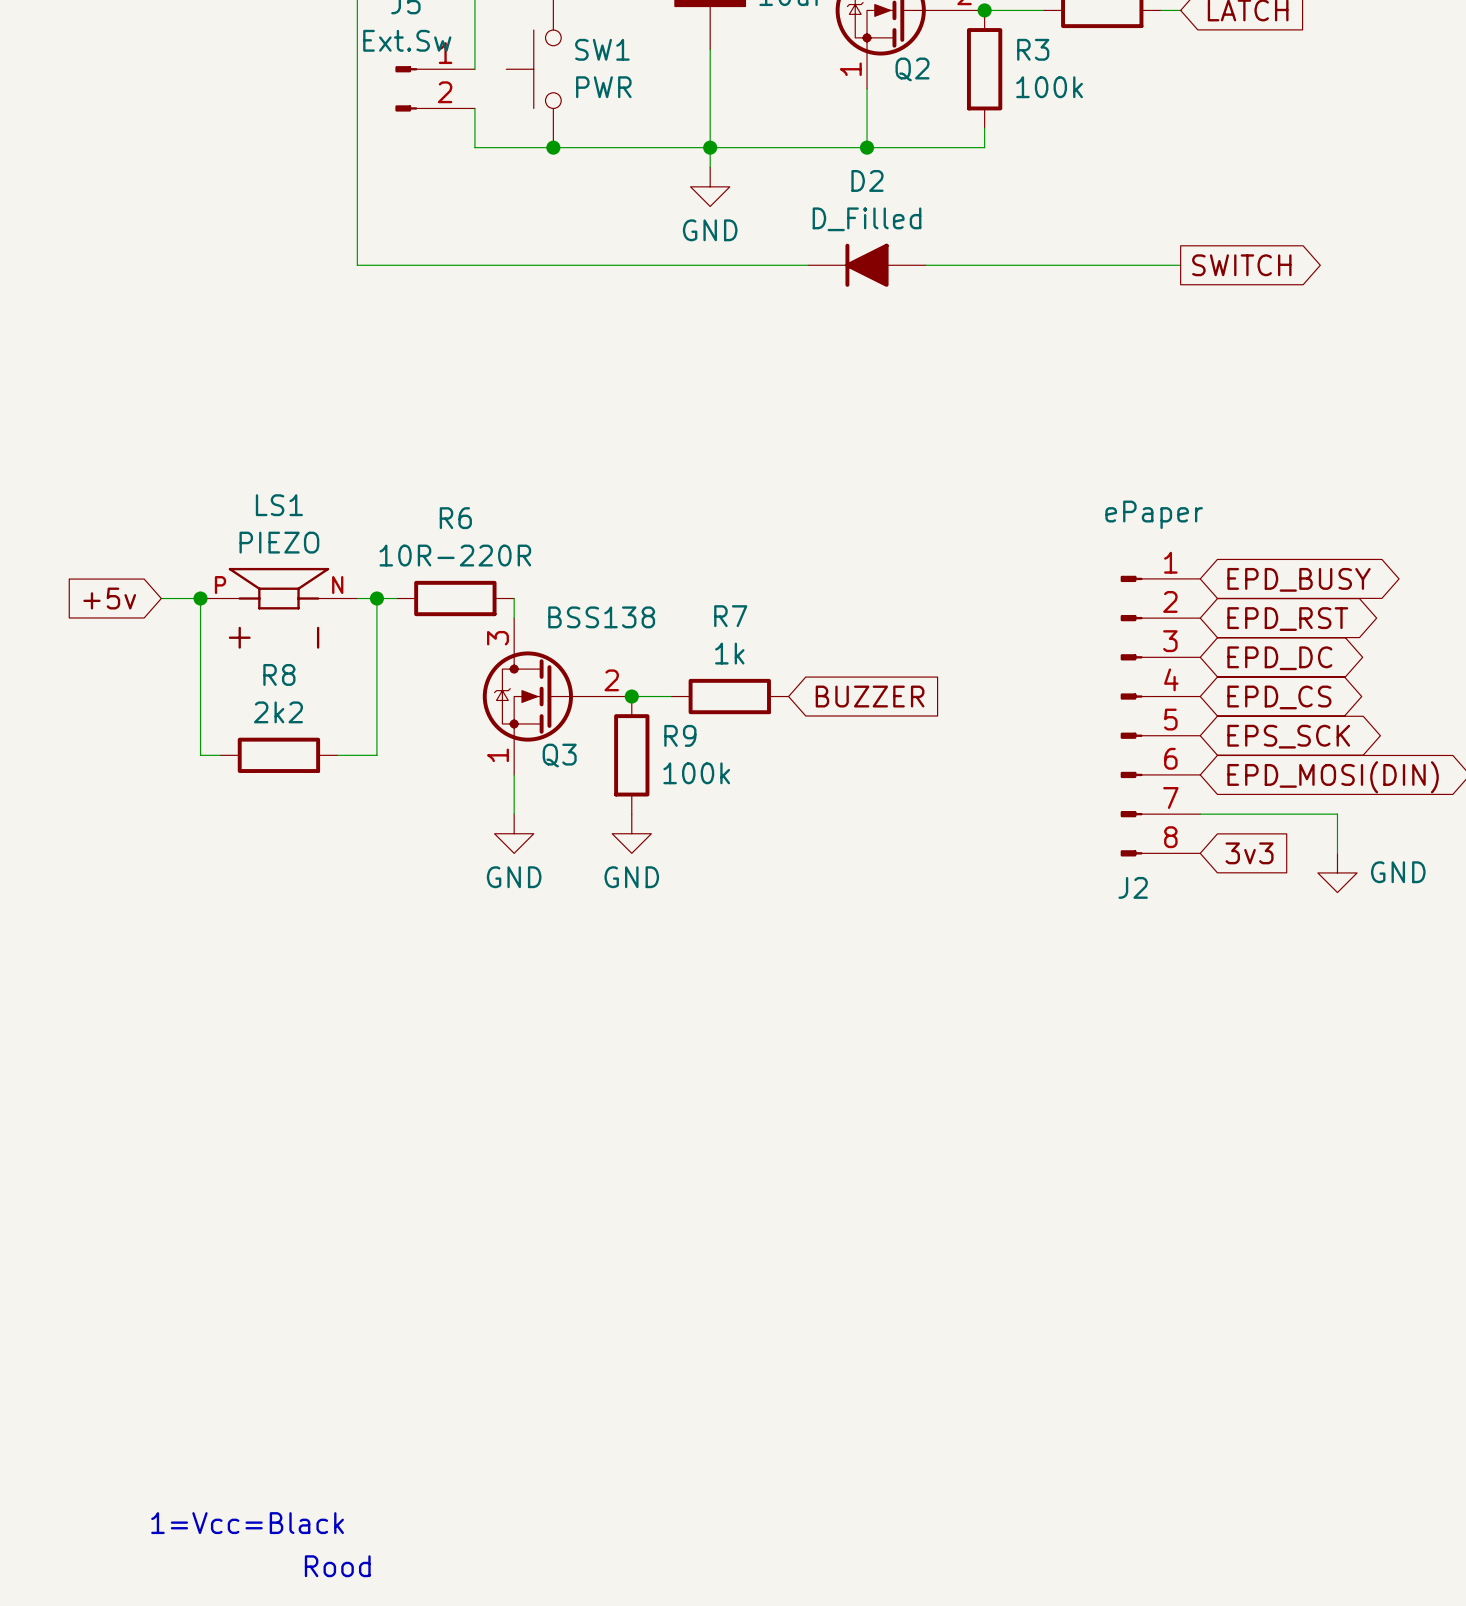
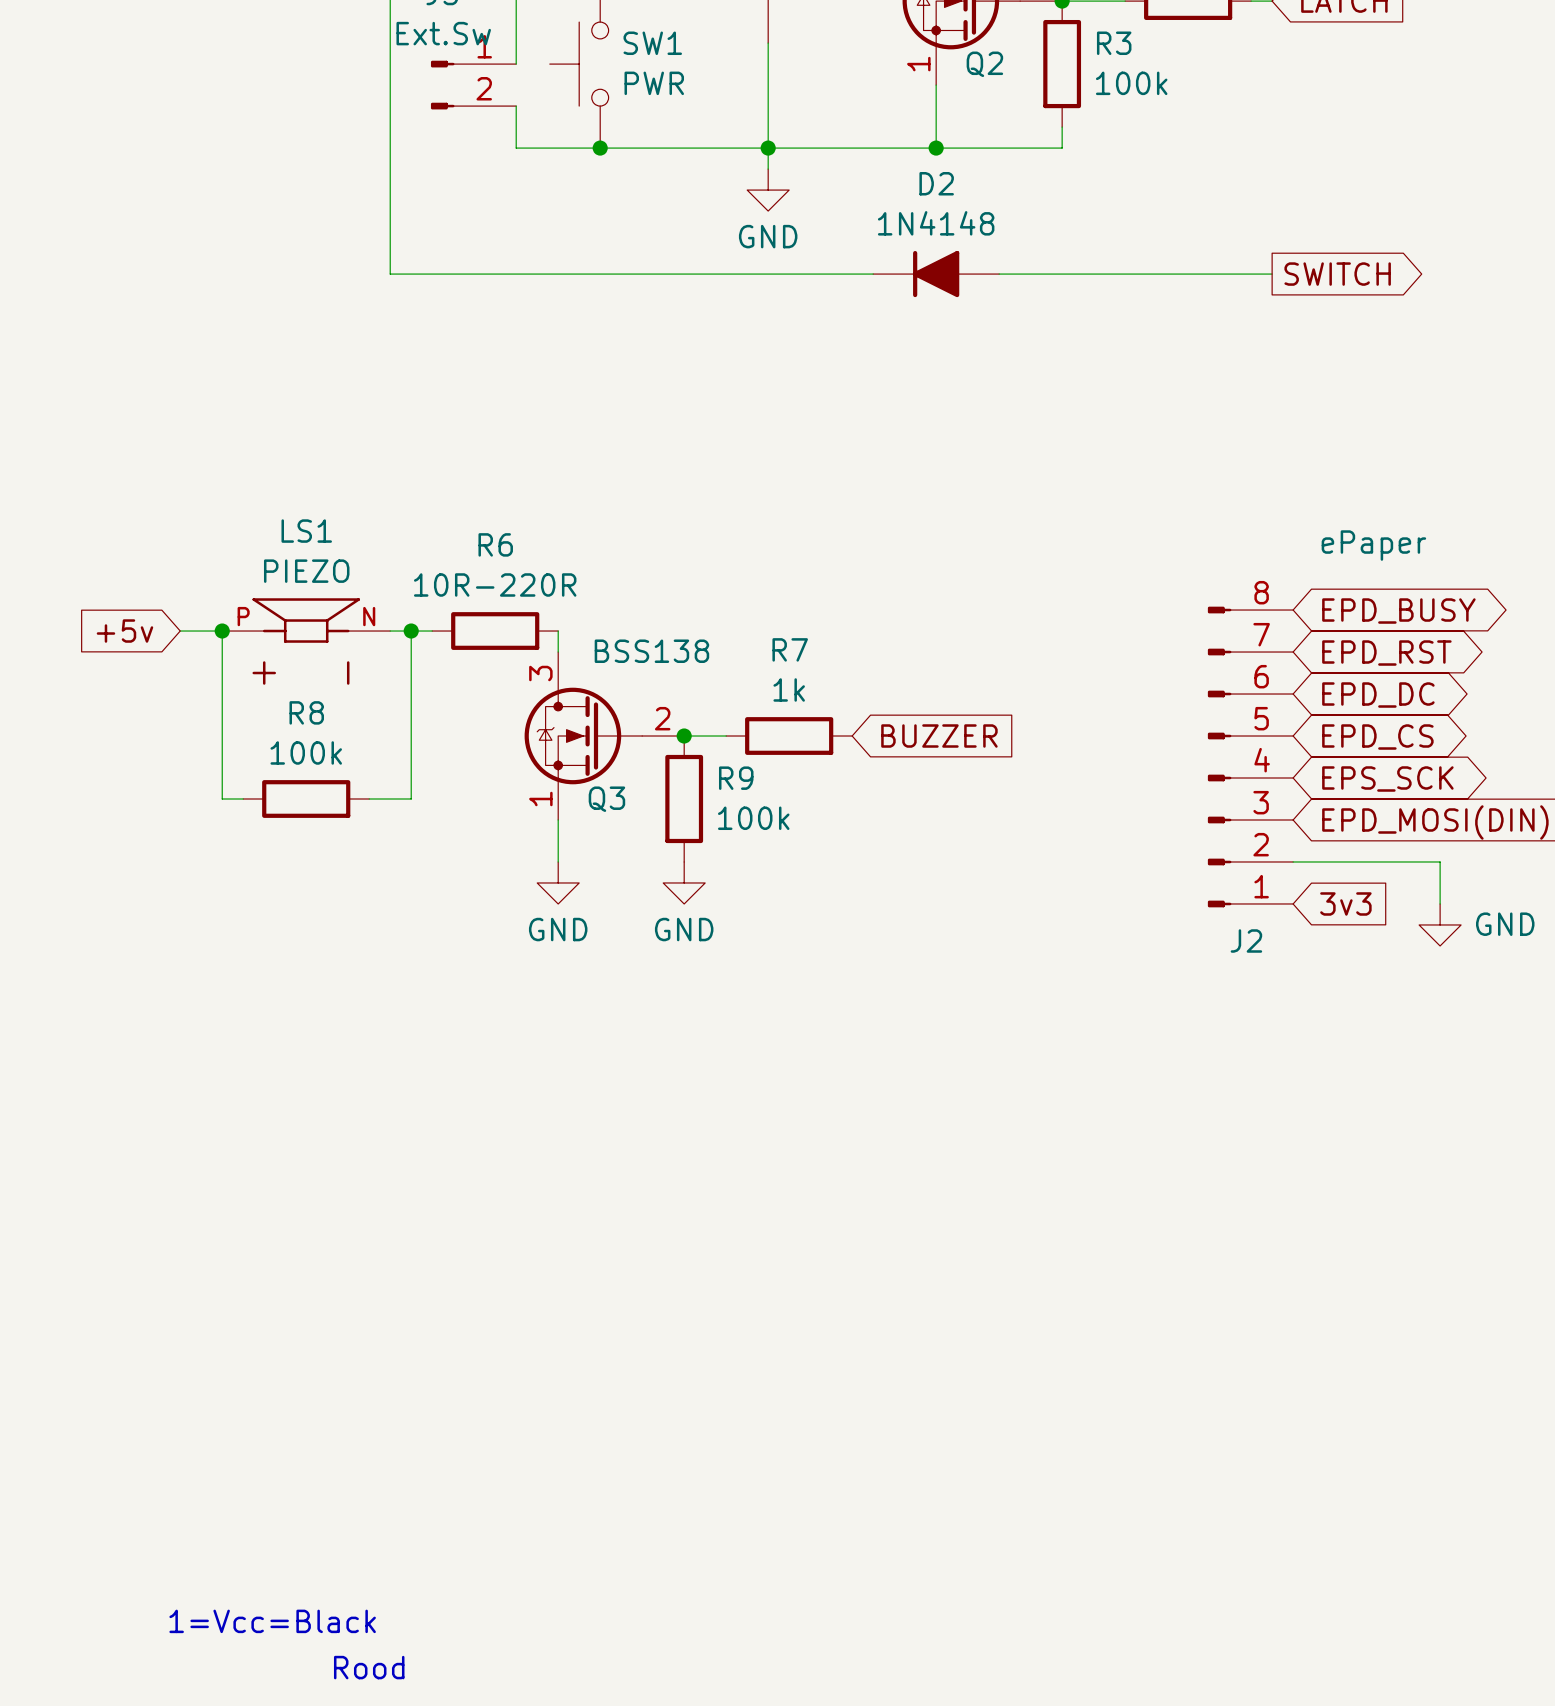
D2 value: D_Filled (867, 219) -> 1N4148 (936, 223)
J2 value position: ePaper (1154, 514) -> ePaper (1373, 545)
R8 value: 2k2 (278, 712) -> 100k (306, 752)
J2 flip: as is (1131, 716) -> up-down (1219, 757)

